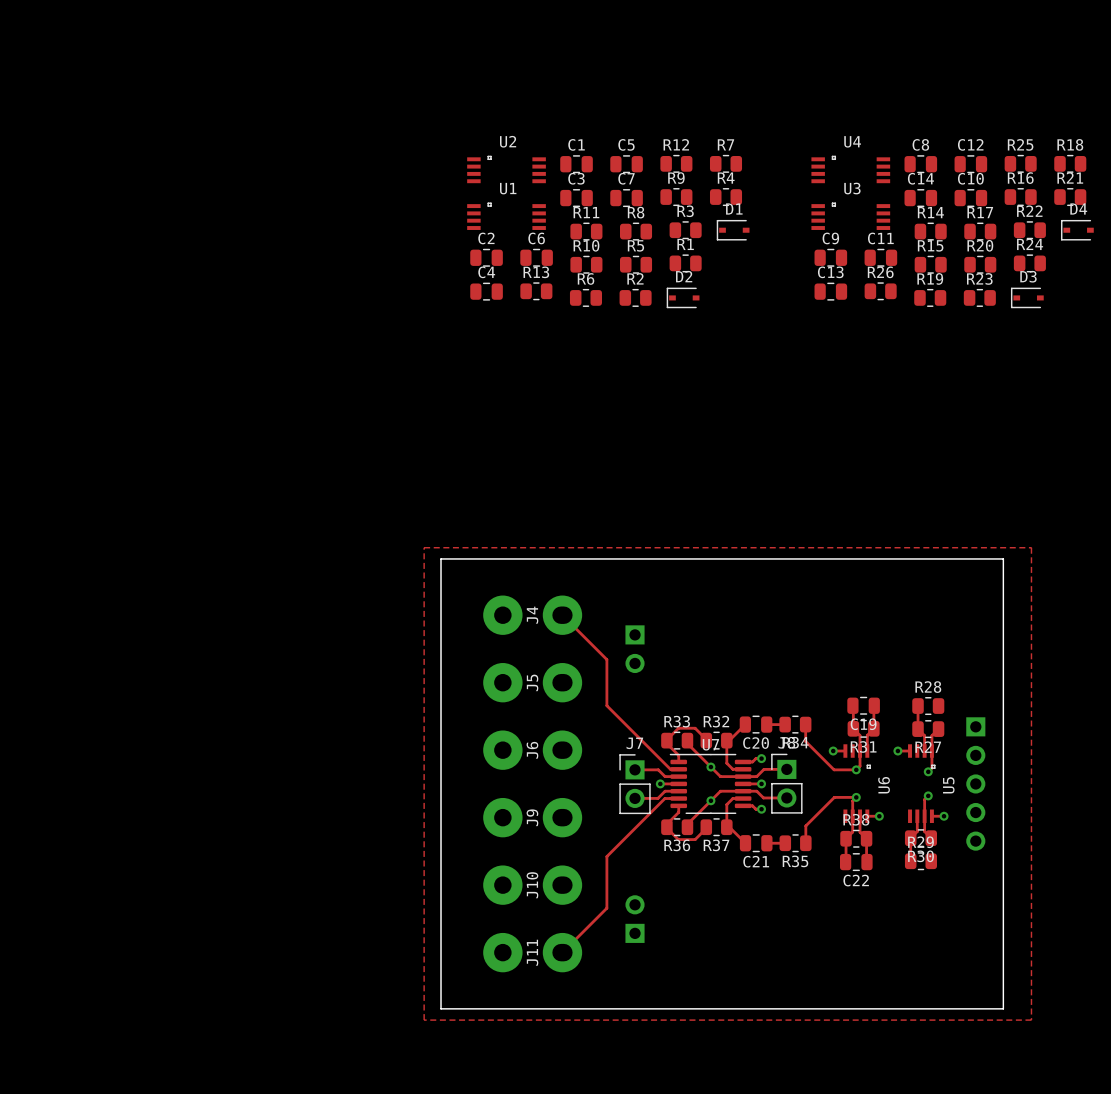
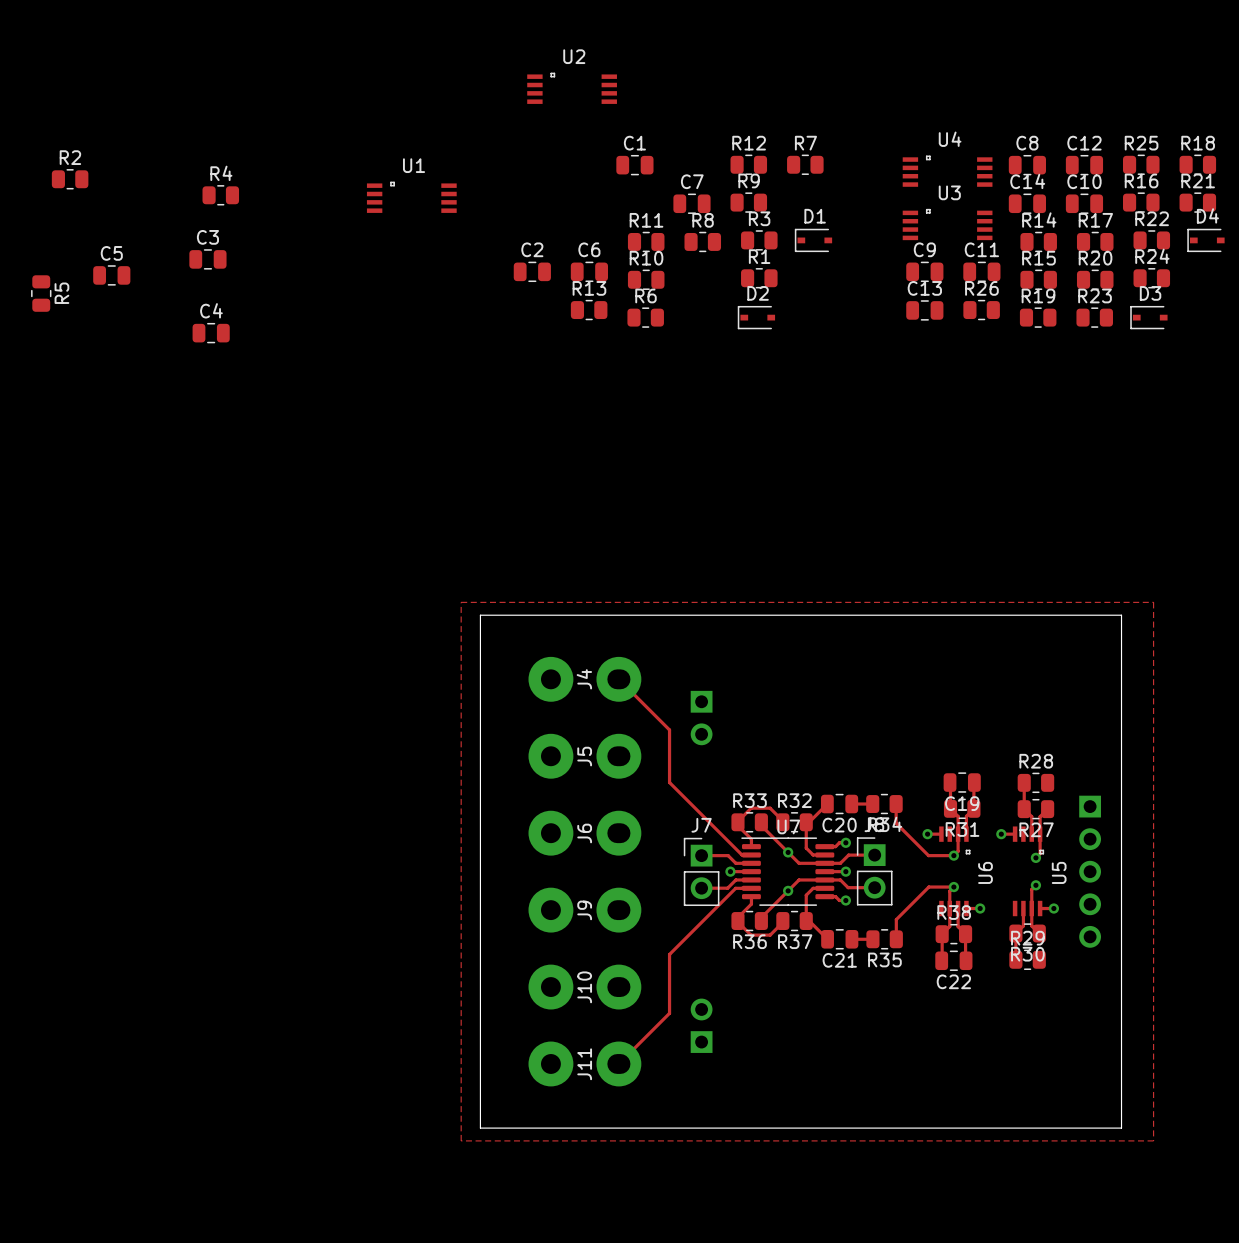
C5 position: (626, 164) -> (111, 275)
U2 position: (506, 169) -> (572, 88)
R4 position: (726, 197) -> (220, 195)
C3 position: (576, 198) -> (207, 259)
U1 position: (506, 216) -> (411, 197)
R5 rotation: 0° (636, 264) -> 90° clockwise (41, 293)
R5 position: (636, 264) -> (41, 293)
C4 position: (486, 291) -> (211, 333)
R2 position: (635, 297) -> (70, 179)

